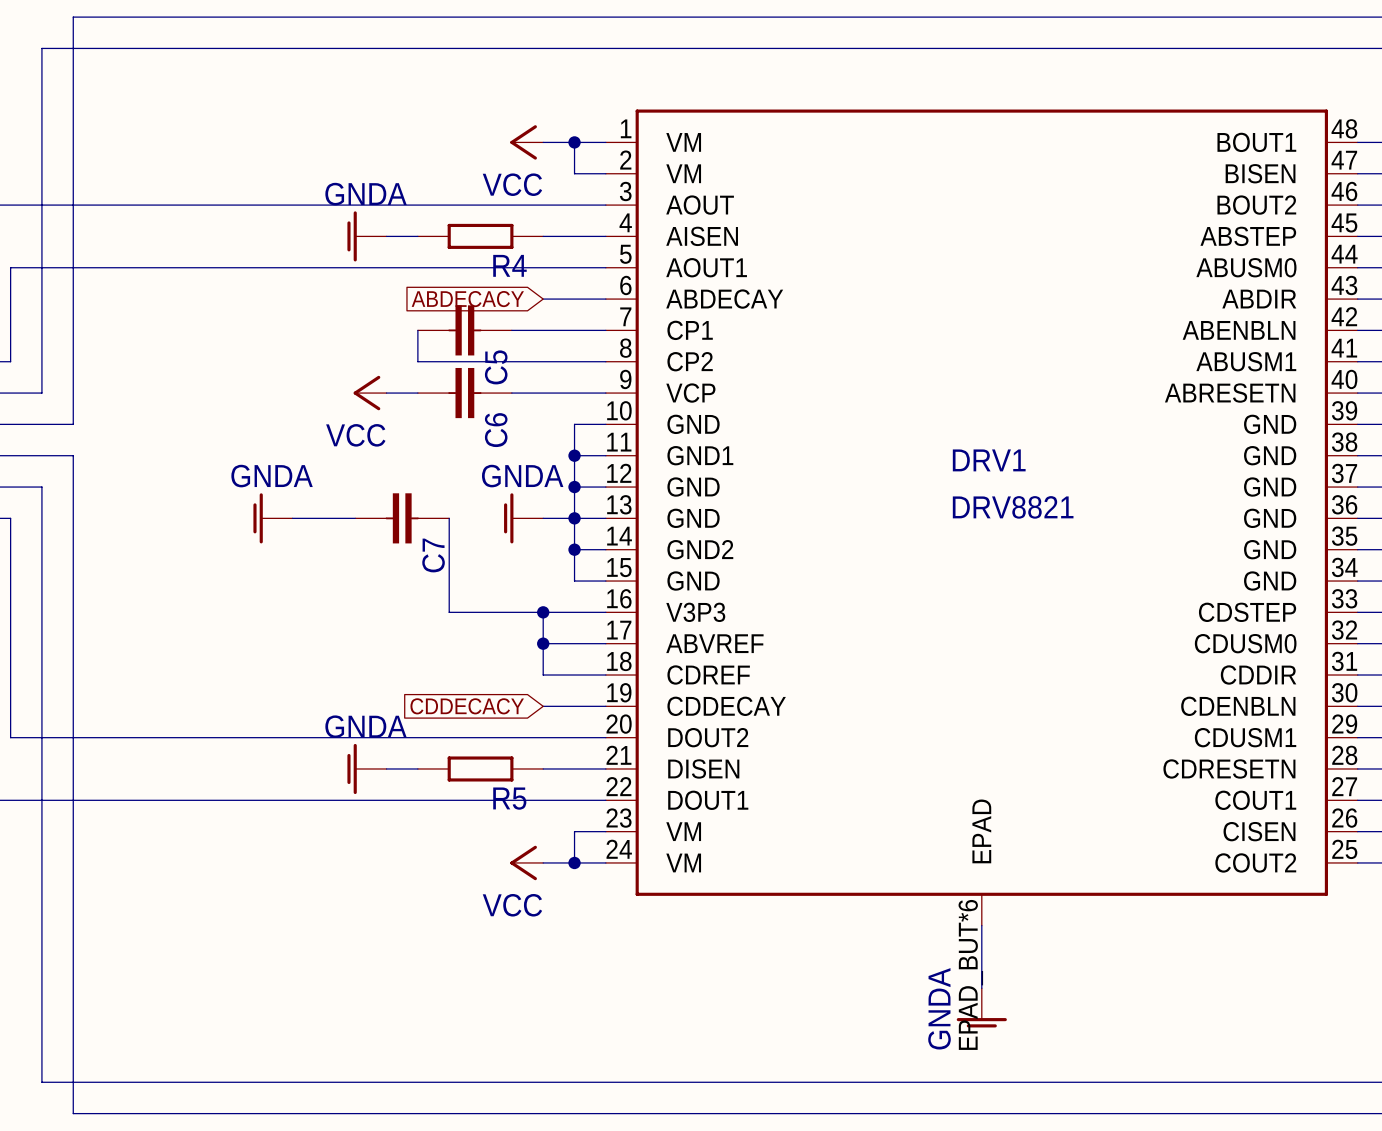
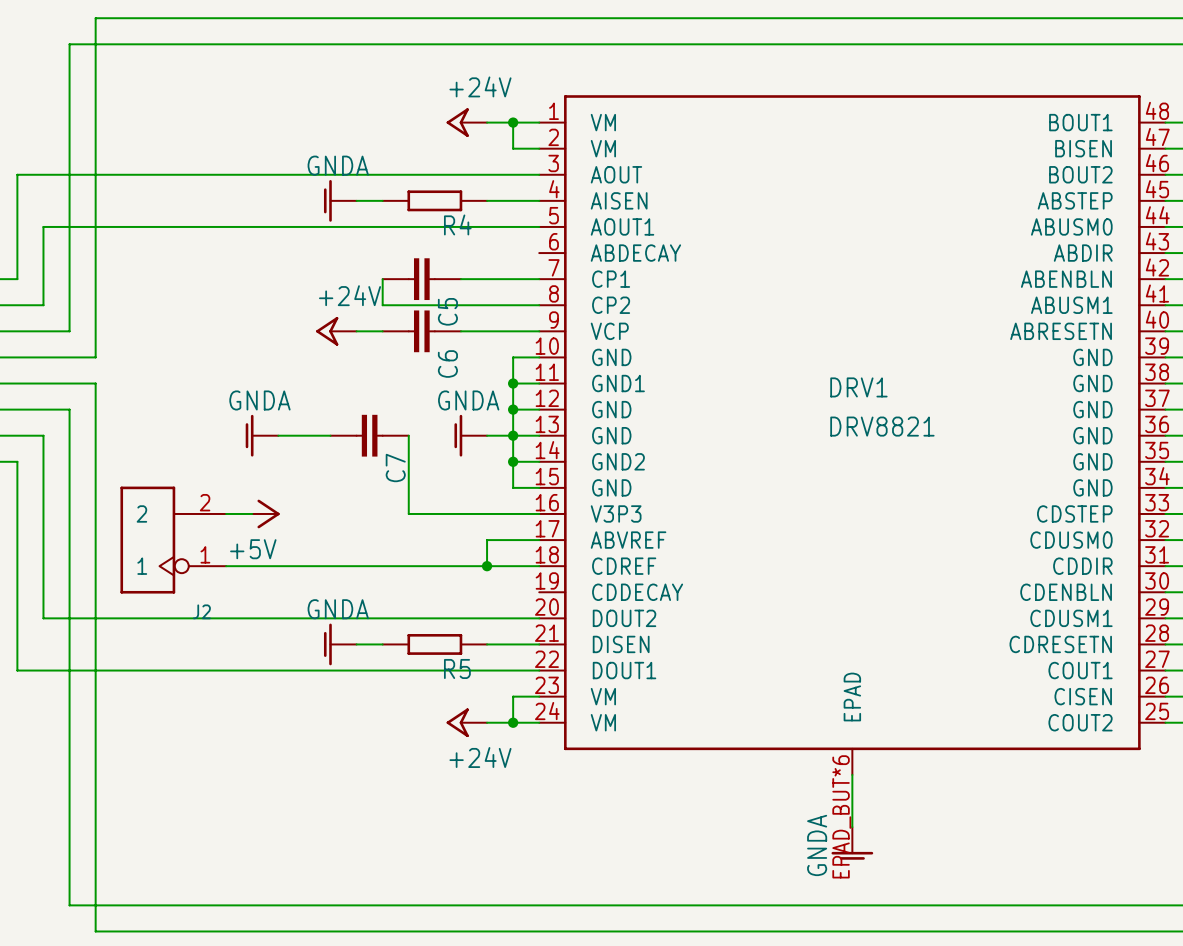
power symbol: VCC (526, 142) -> +24V (466, 122)
global label: ABDECACY (467, 299) -> none
wire: (543, 299) (605, 299) -> none
power symbol: VCC (370, 393) -> +24V (336, 331)
wire: none -> (226, 513) (252, 513)
power symbol: none -> +5V (265, 513)
wire: (543, 612) (543, 643) -> none
junction: (543, 612) -> none
J2: none -> (173, 540)
junction: (543, 643) -> none
wire: none -> (226, 566) (487, 566)
junction: none -> (487, 566)
global label: CDDECACY (467, 706) -> none
wire: (543, 706) (605, 706) -> none
power symbol: VCC (526, 862) -> +24V (466, 722)

